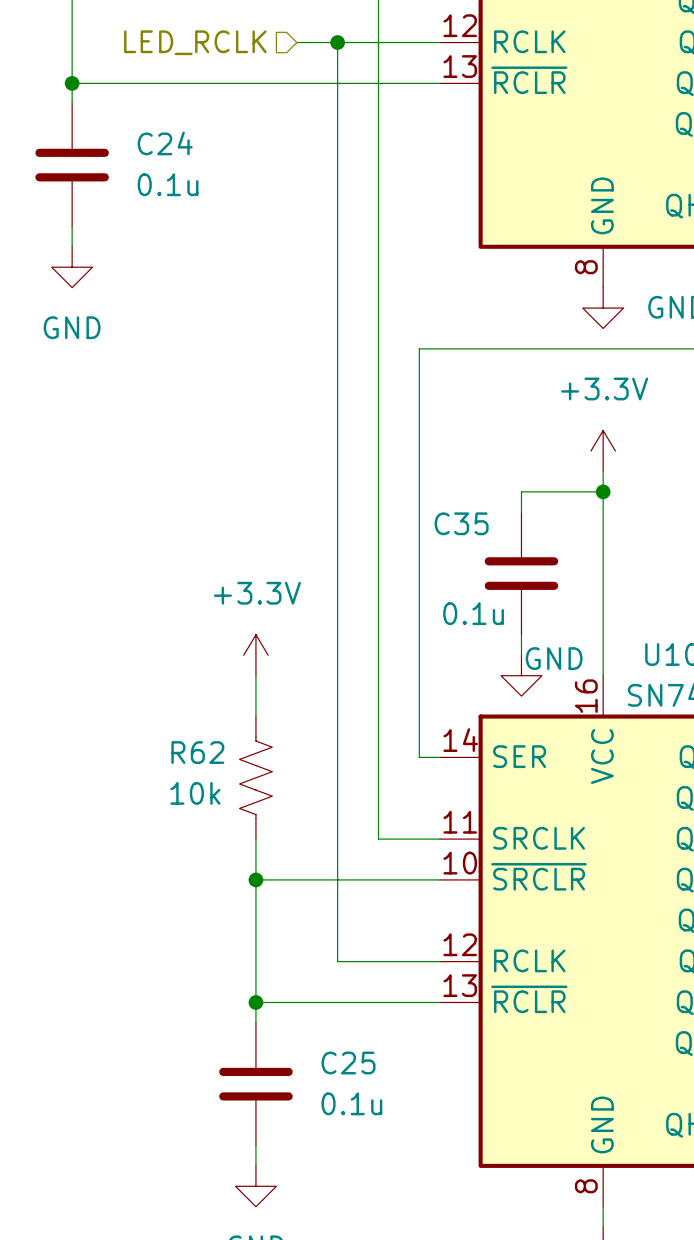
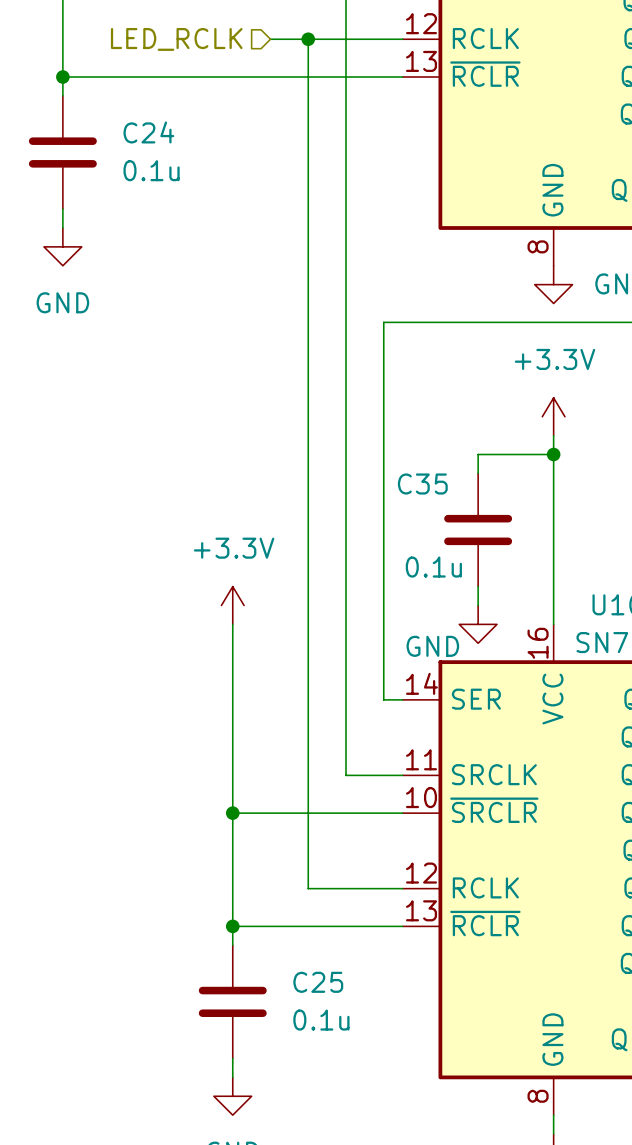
power symbol text position: GND (554, 658) -> GND (432, 646)
wire: none -> (232, 662) (232, 775)
R62: 10k (255, 777) -> none

